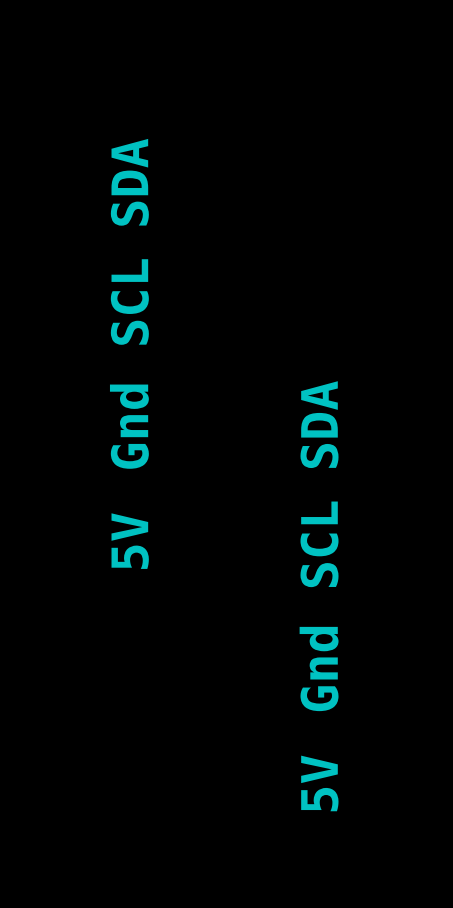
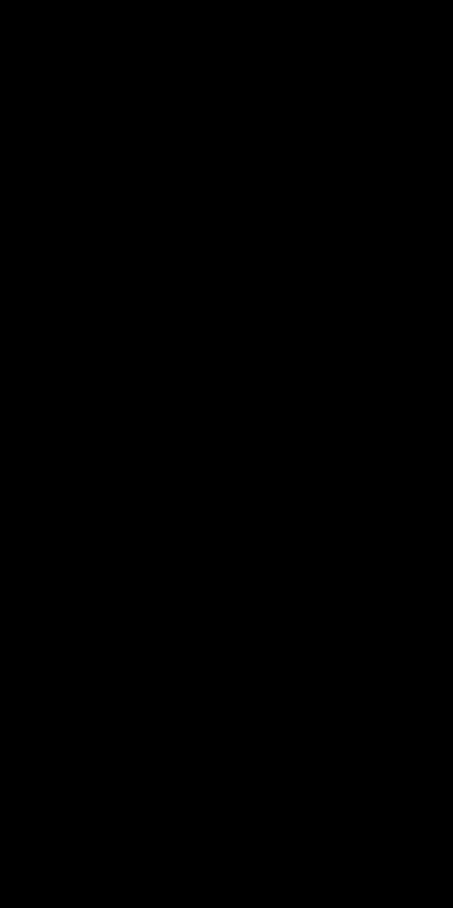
text: SDA (129, 182) -> none
text: SCL (129, 302) -> none
text: SDA (319, 424) -> none
text: Gnd (129, 426) -> none
text: 5V (130, 541) -> none
text: SCL (319, 544) -> none
text: Gnd (319, 669) -> none
text: 5V (319, 783) -> none

